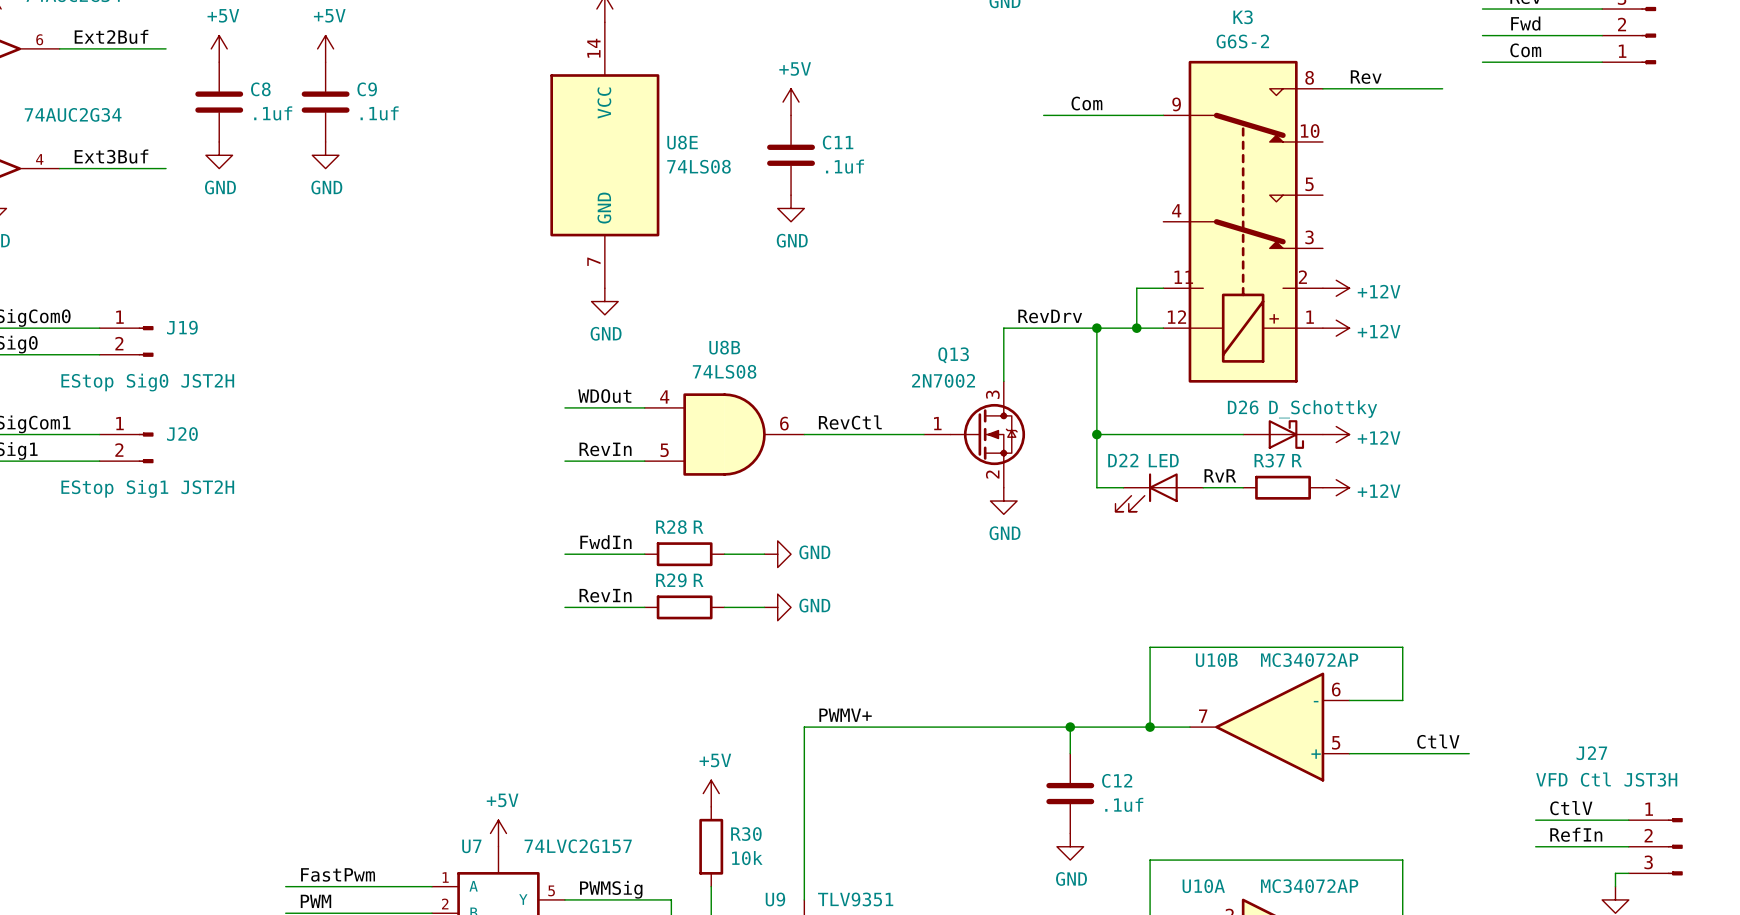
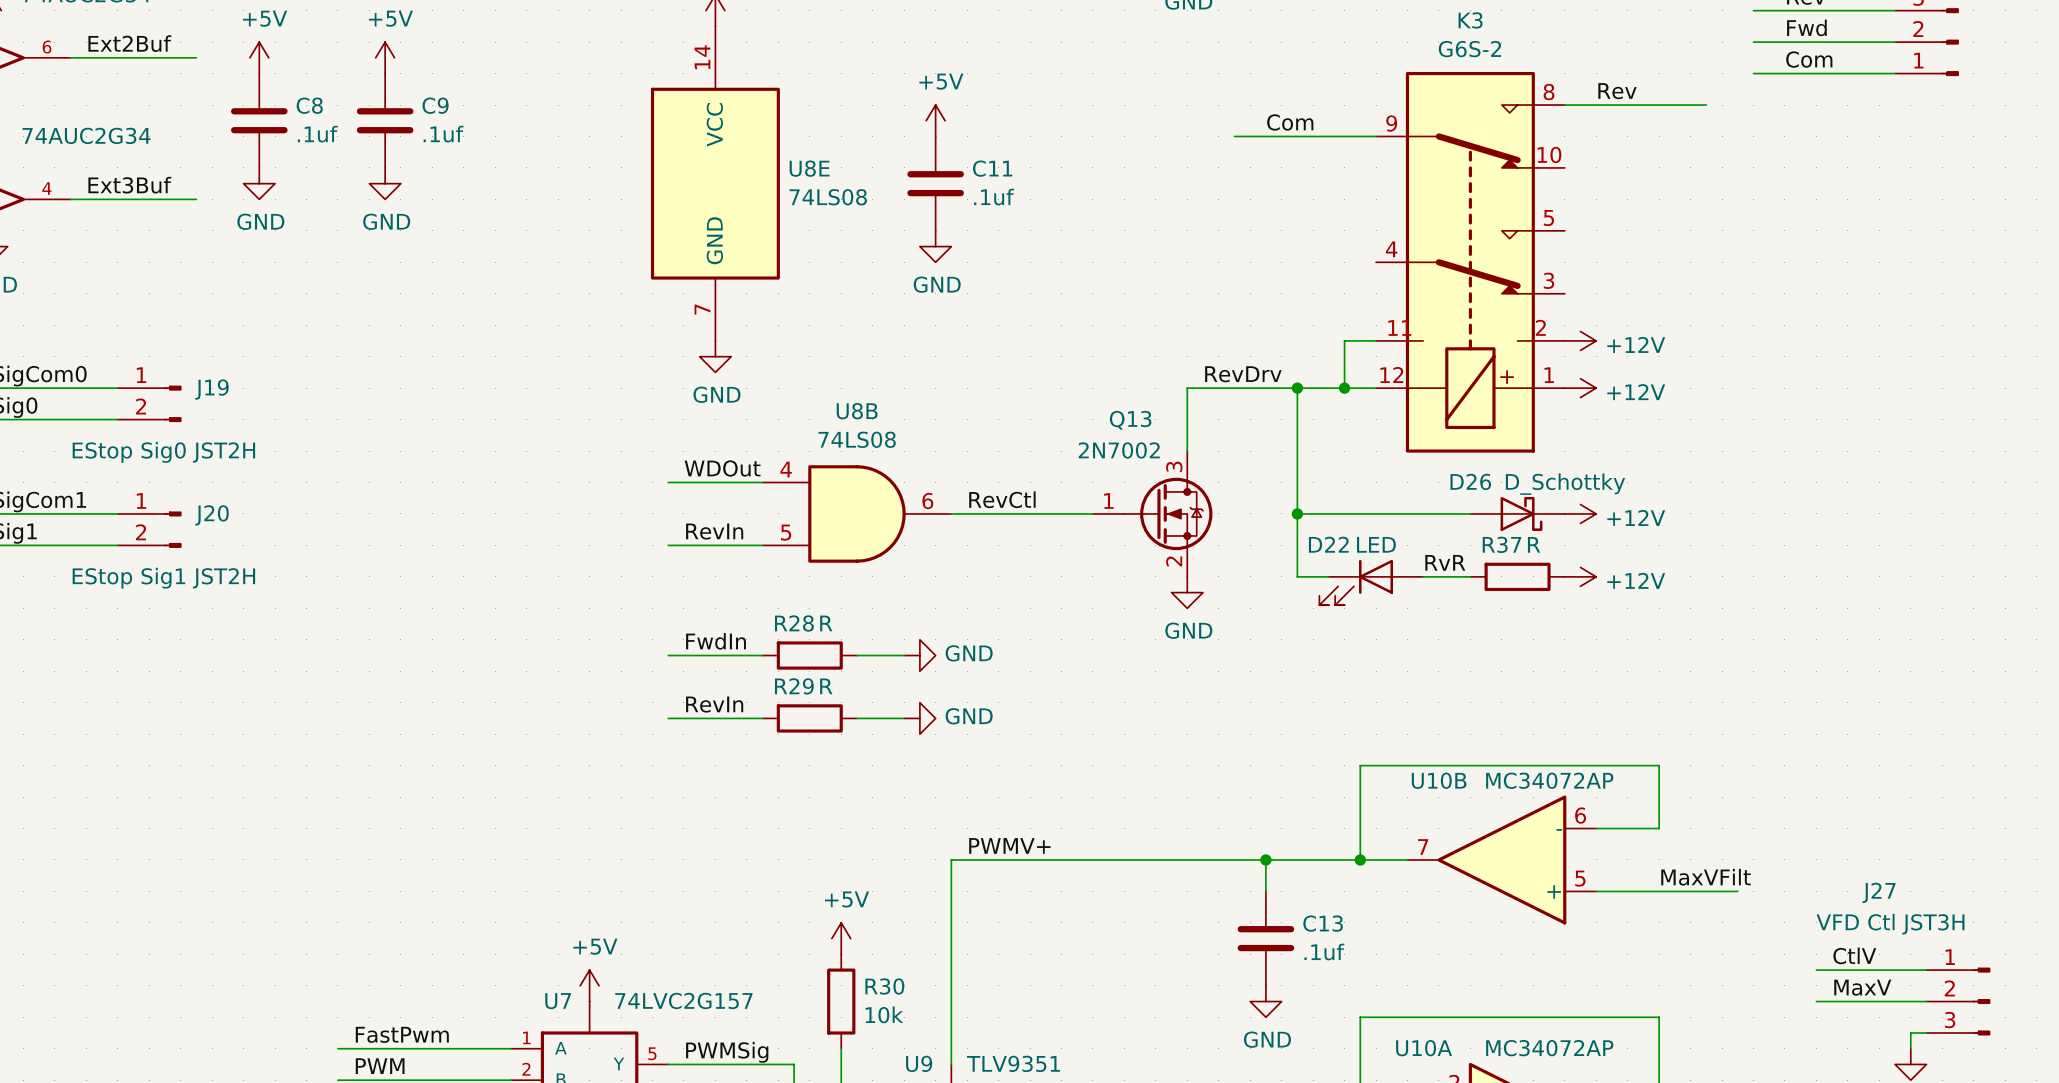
label: CtlV (1438, 741) -> none
label: none -> MaxVFilt (1706, 877)
C12 name: C12 (1117, 780) -> C13 (1323, 923)
label: RefIn (1576, 834) -> MaxV (1862, 987)

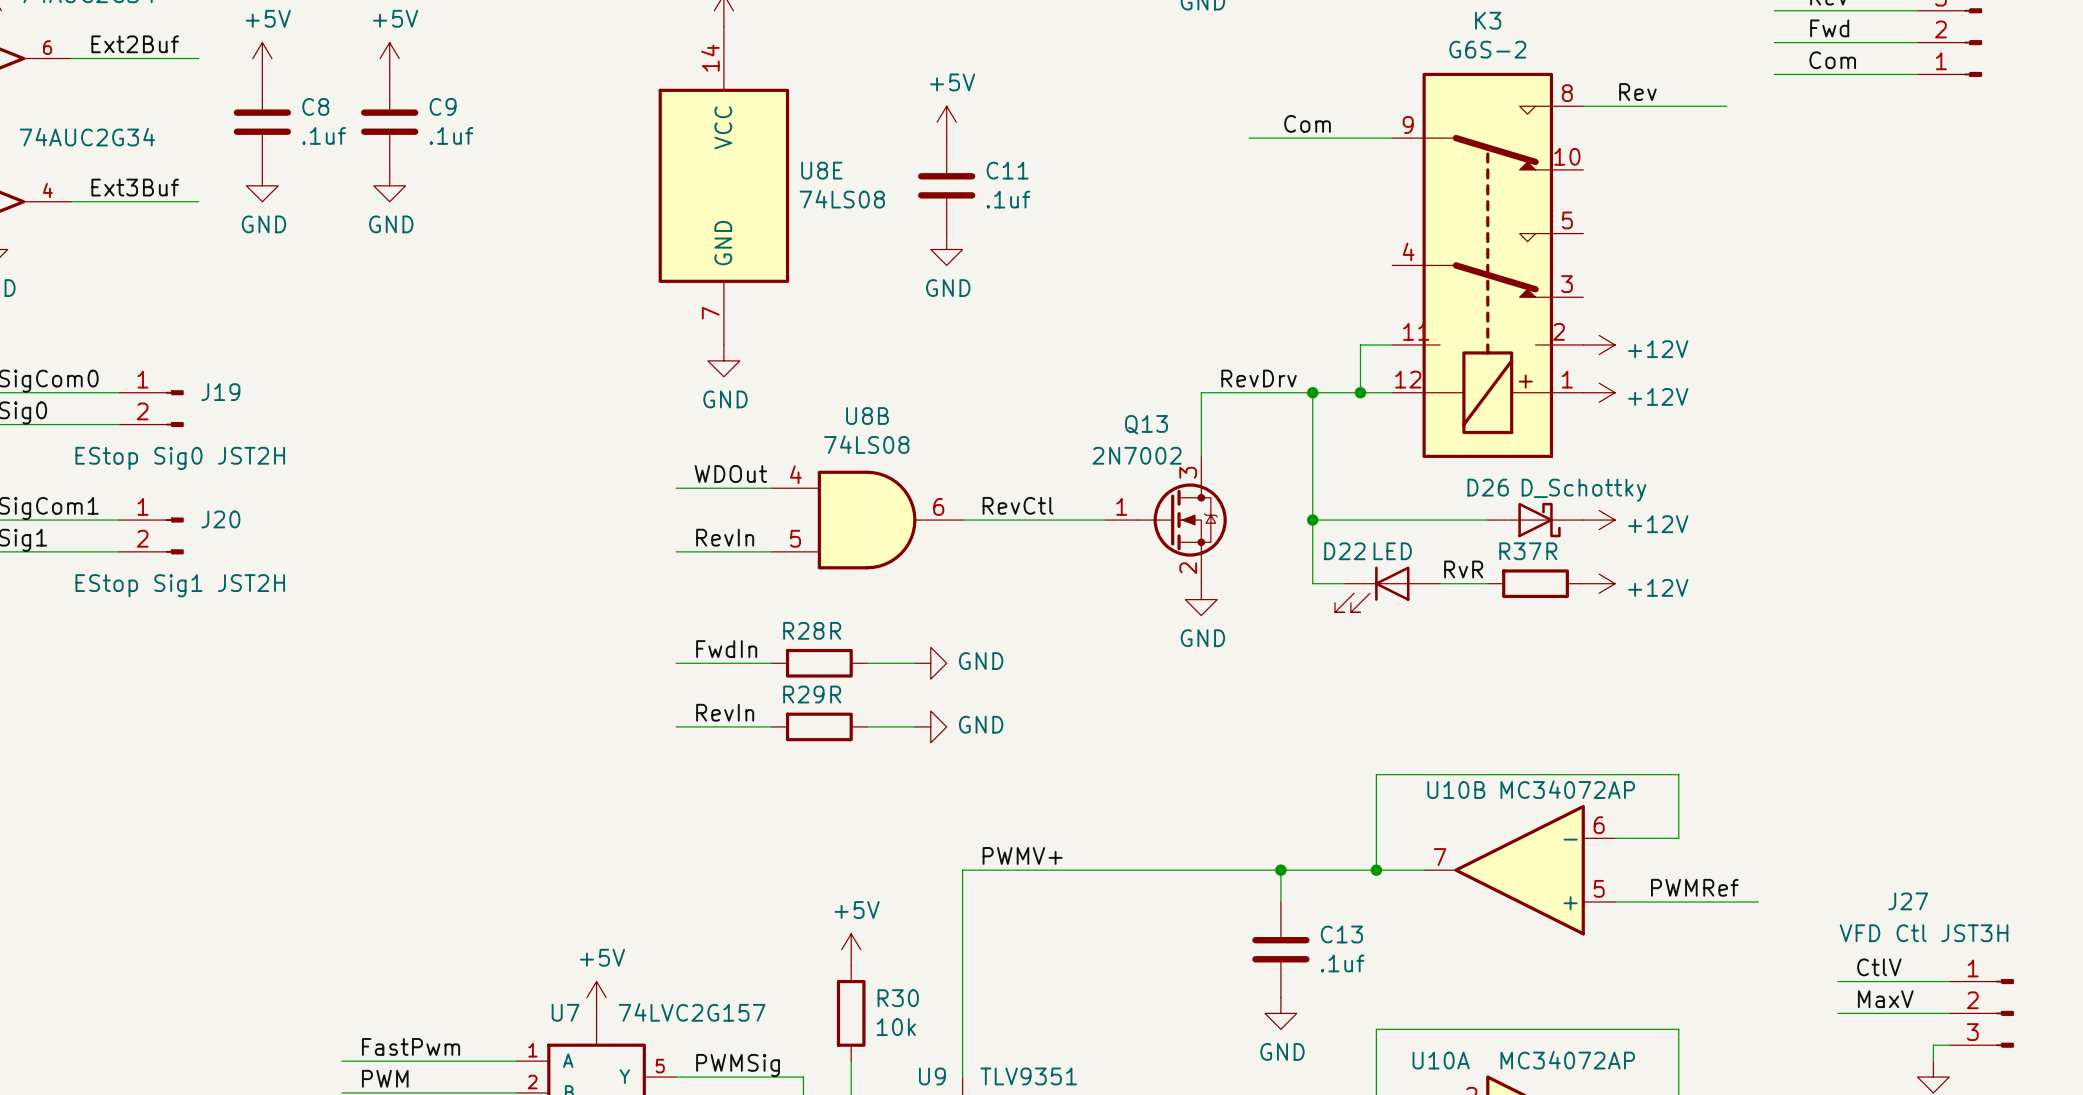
label: none -> PWMRef (1694, 887)
label: MaxVFilt (1706, 877) -> none

